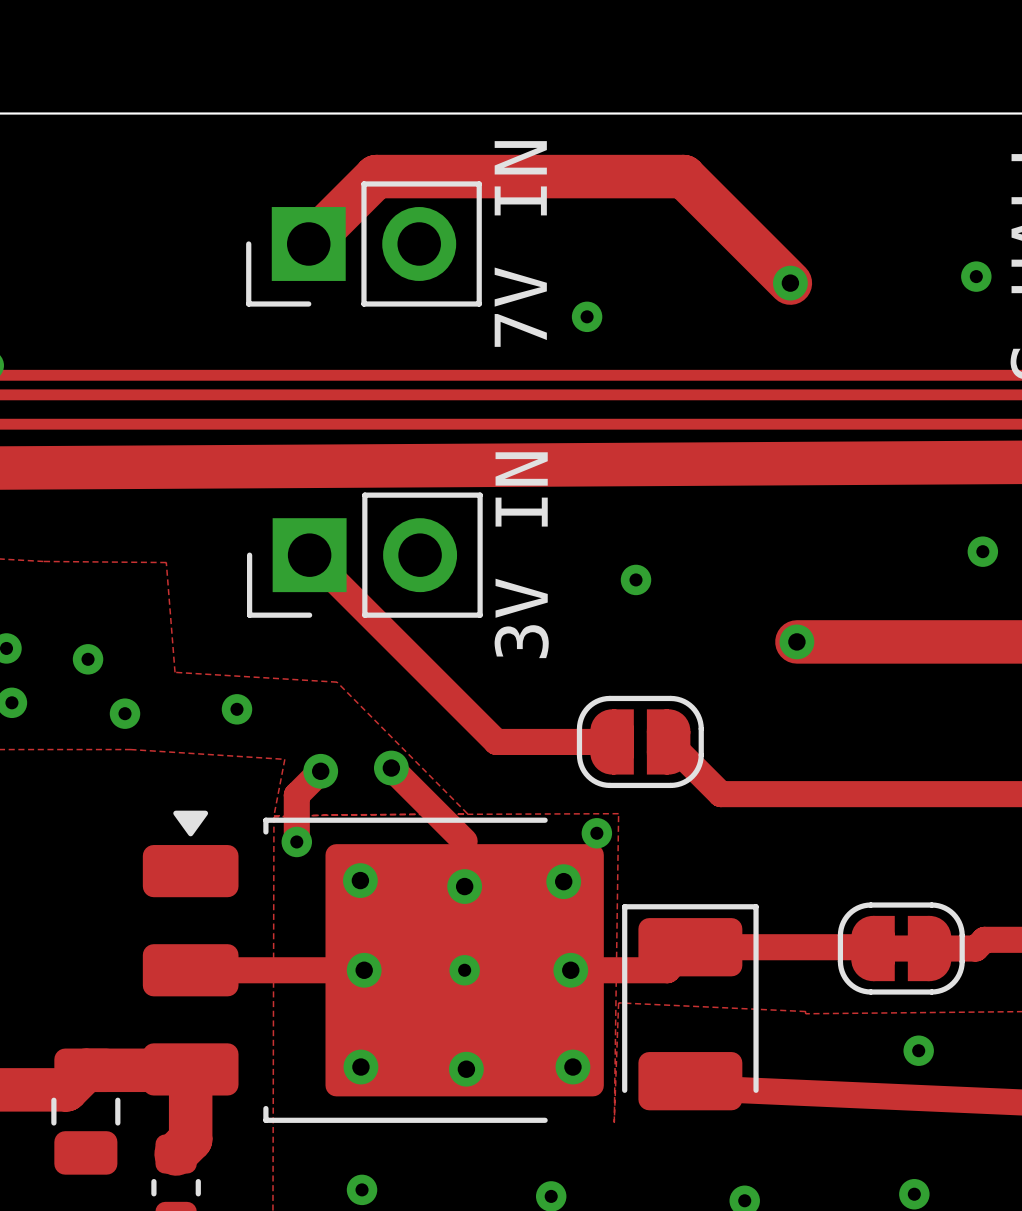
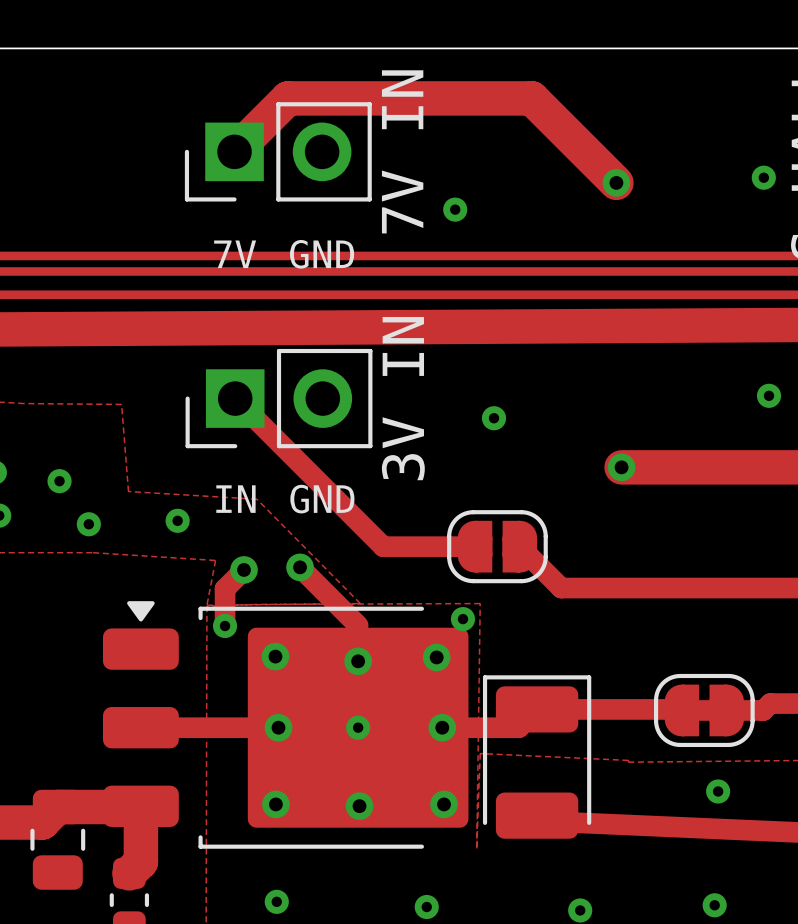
text: none -> 7V (235, 254)
text: none -> GND (322, 254)
text: none -> IN (235, 499)
text: none -> GND (322, 499)

